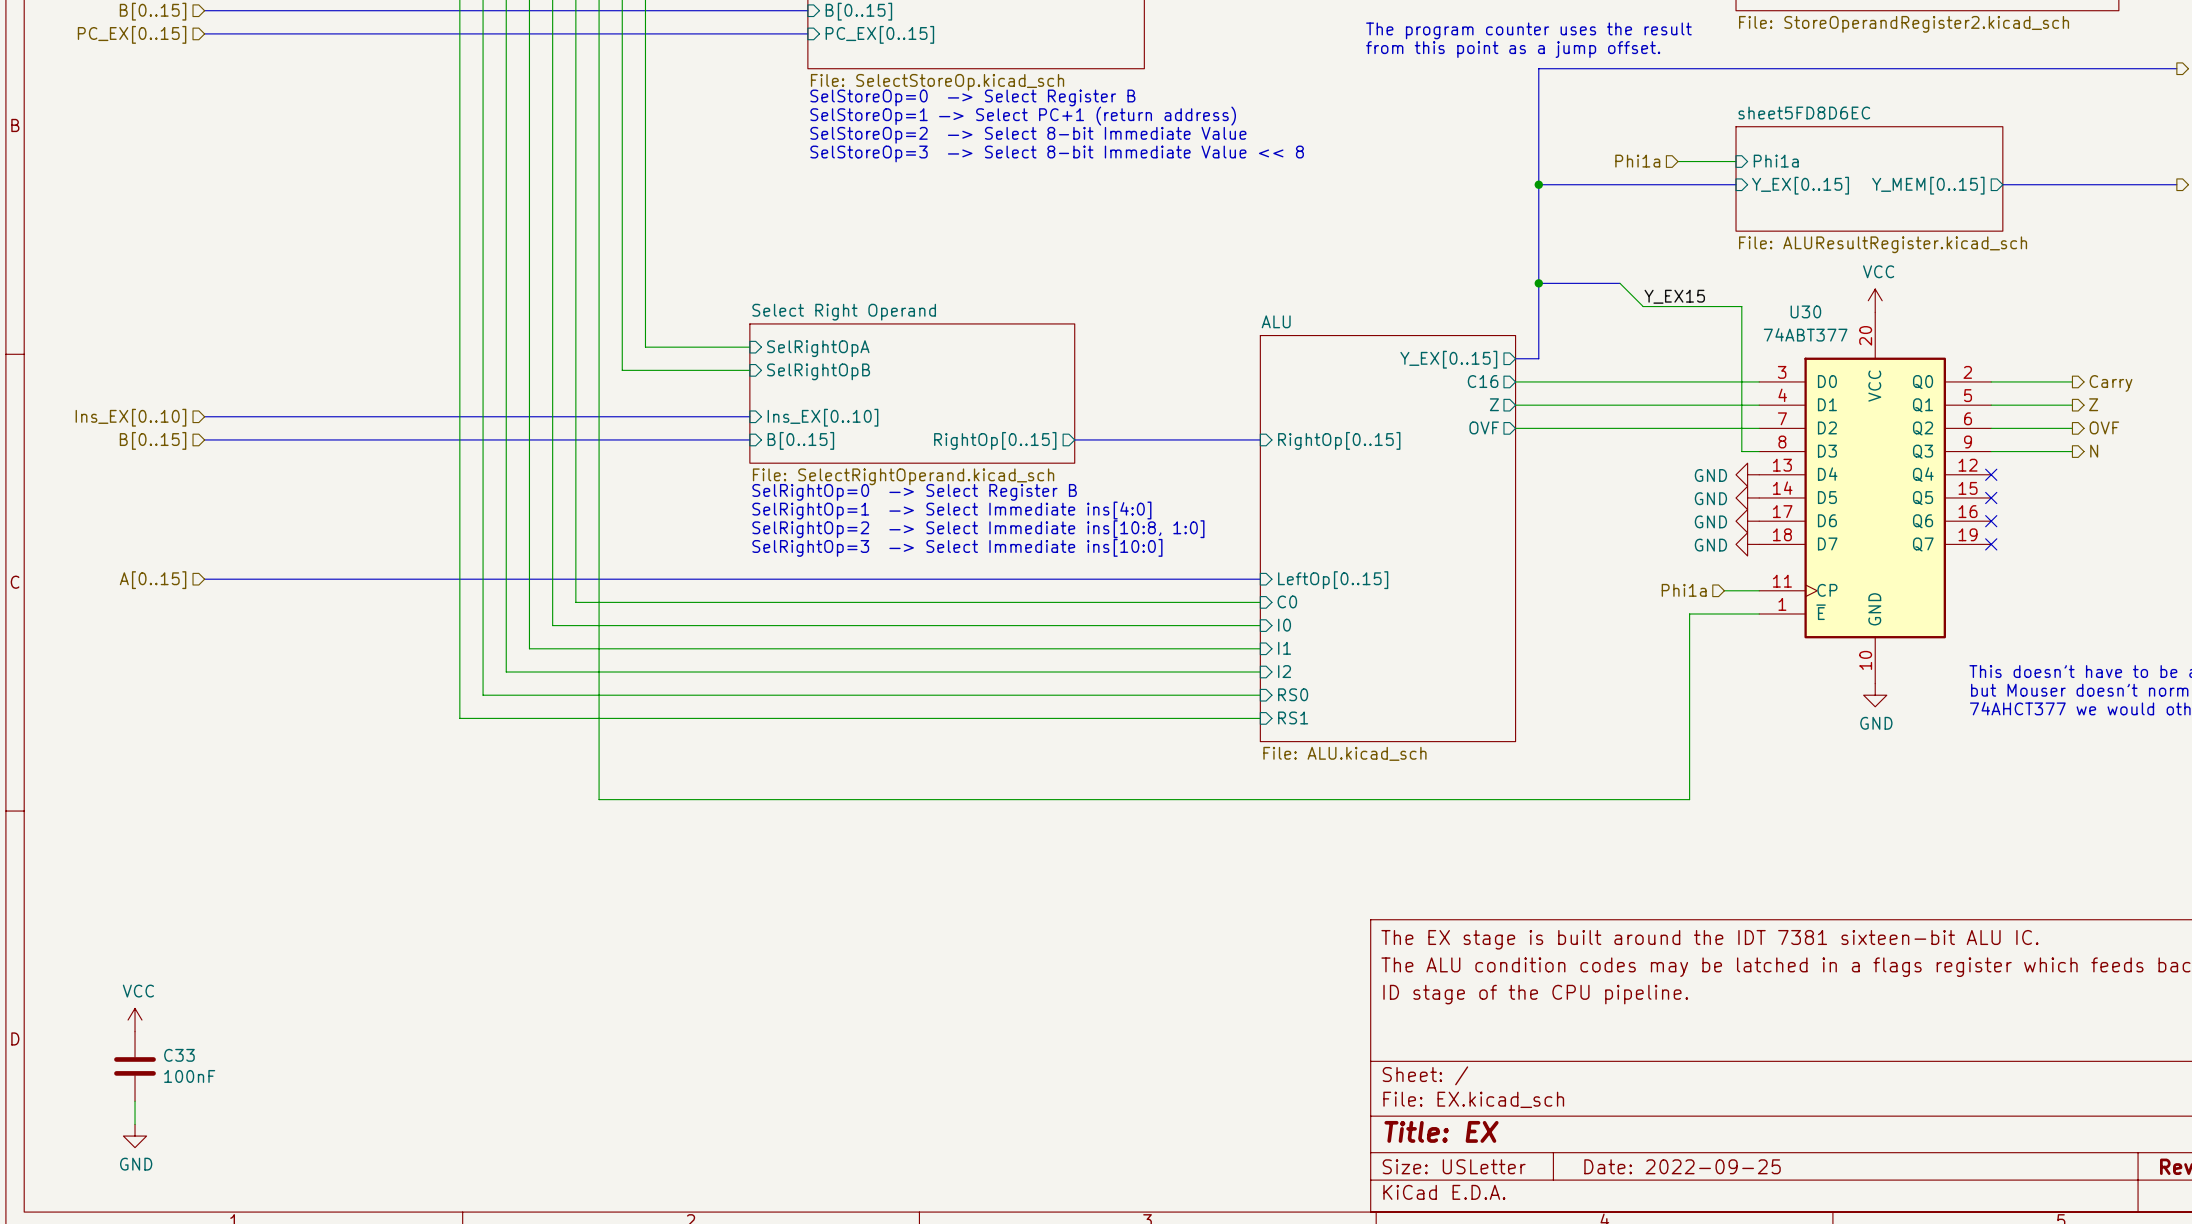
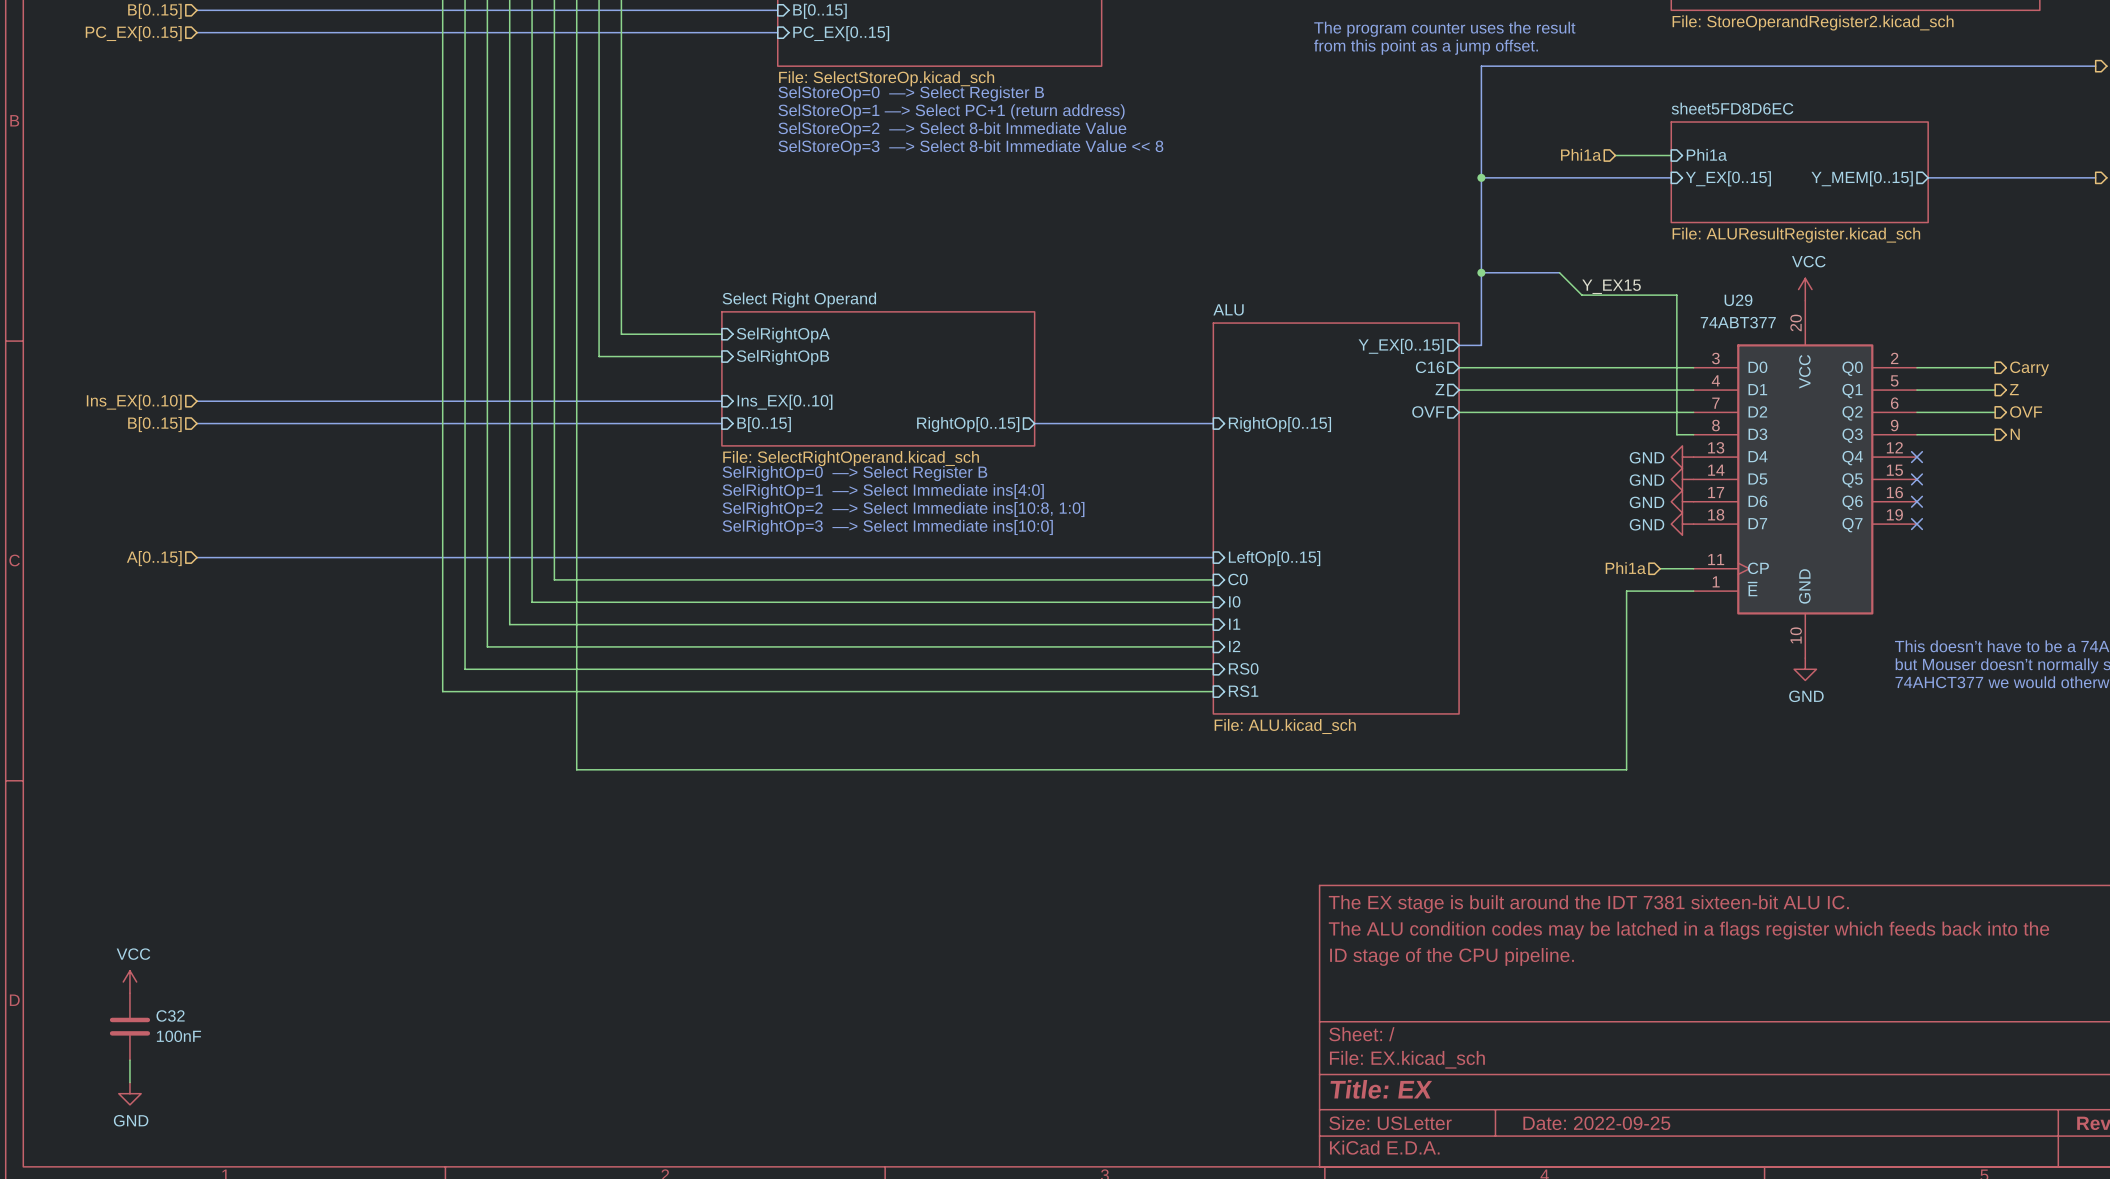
U30 name: U30 (1805, 311) -> U29 (1738, 300)
C33 name: C33 (179, 1055) -> C32 (170, 1015)

